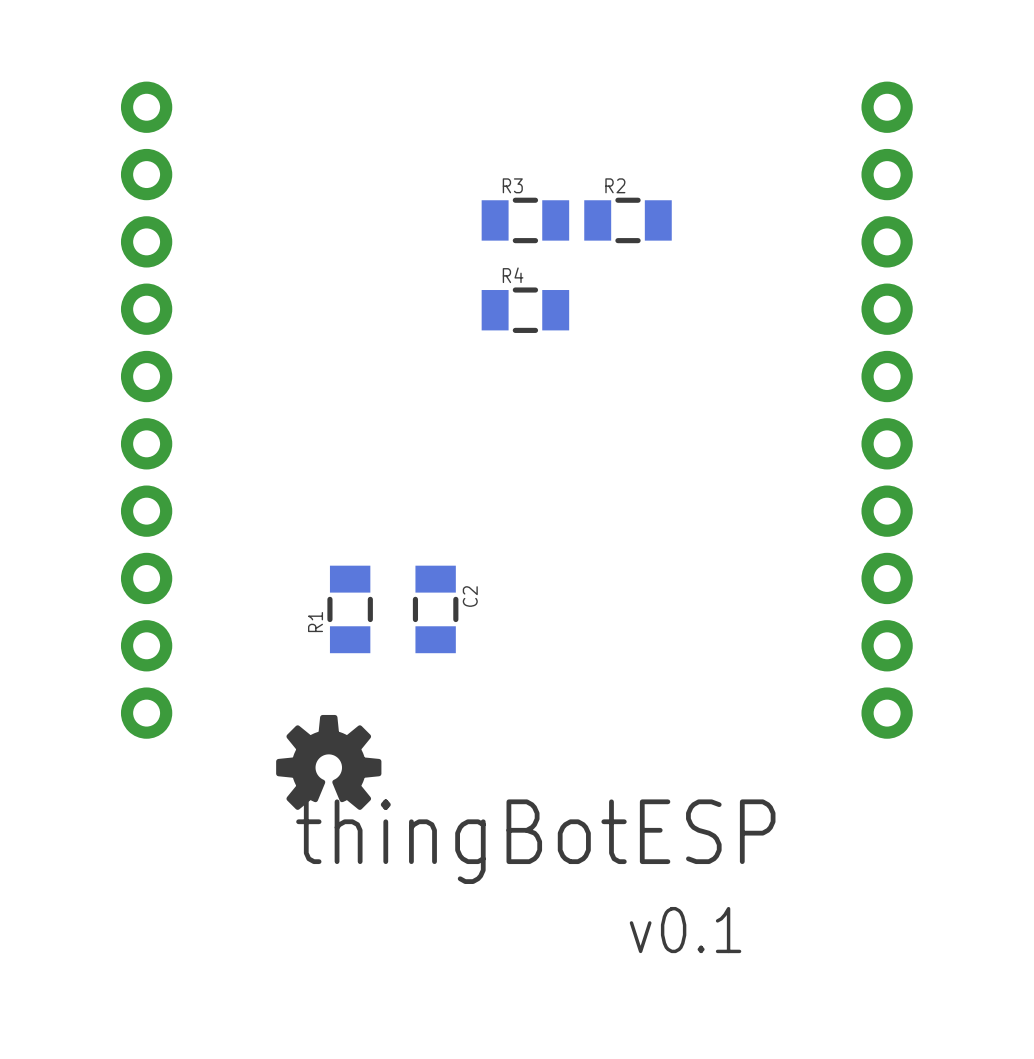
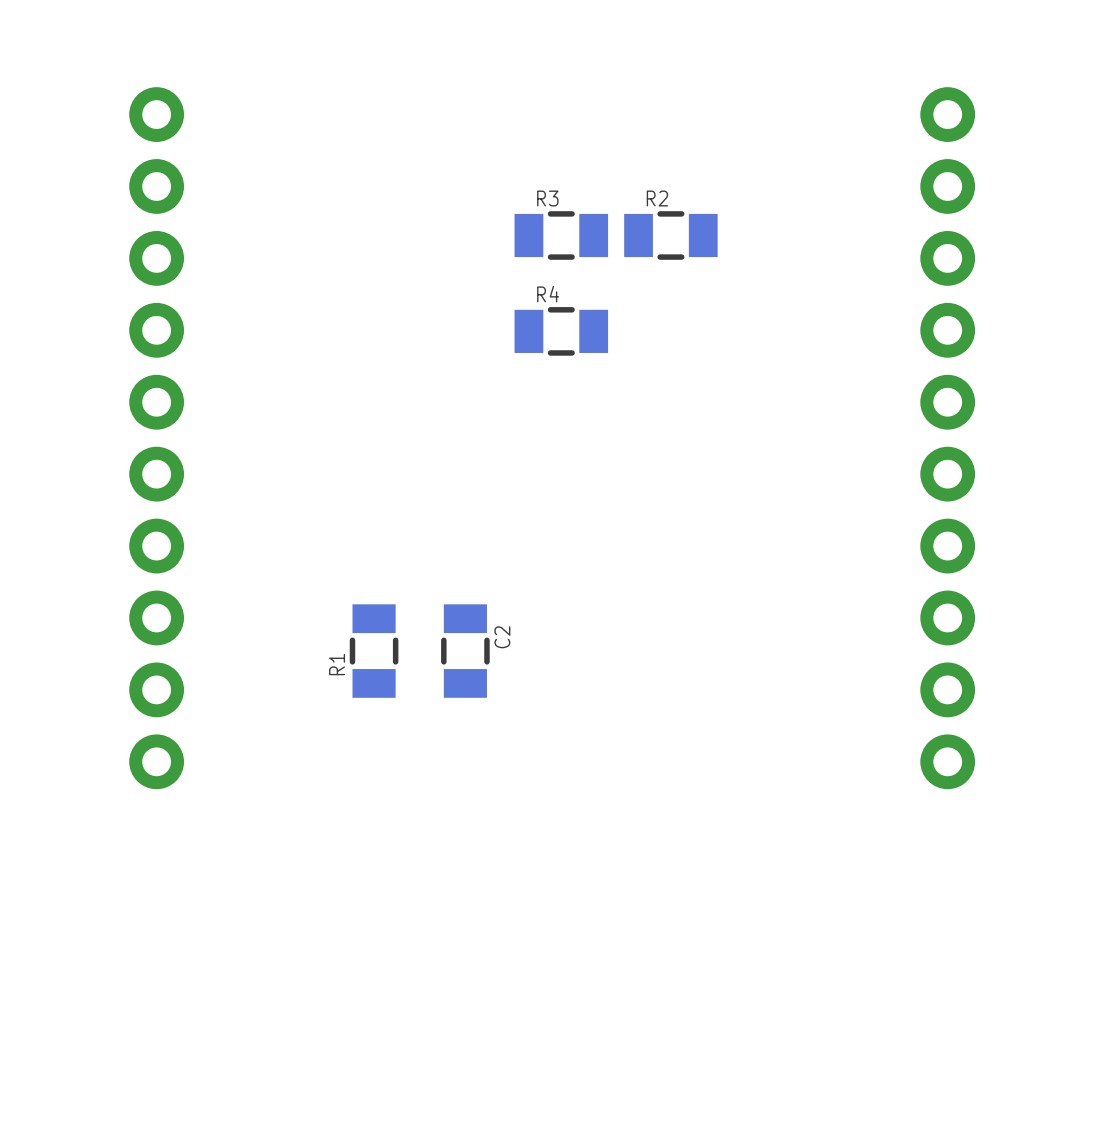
drawing: [276, 714, 382, 810] -> none
text: thingBotESP (535, 841) -> none
text: v0.1 (685, 930) -> none

